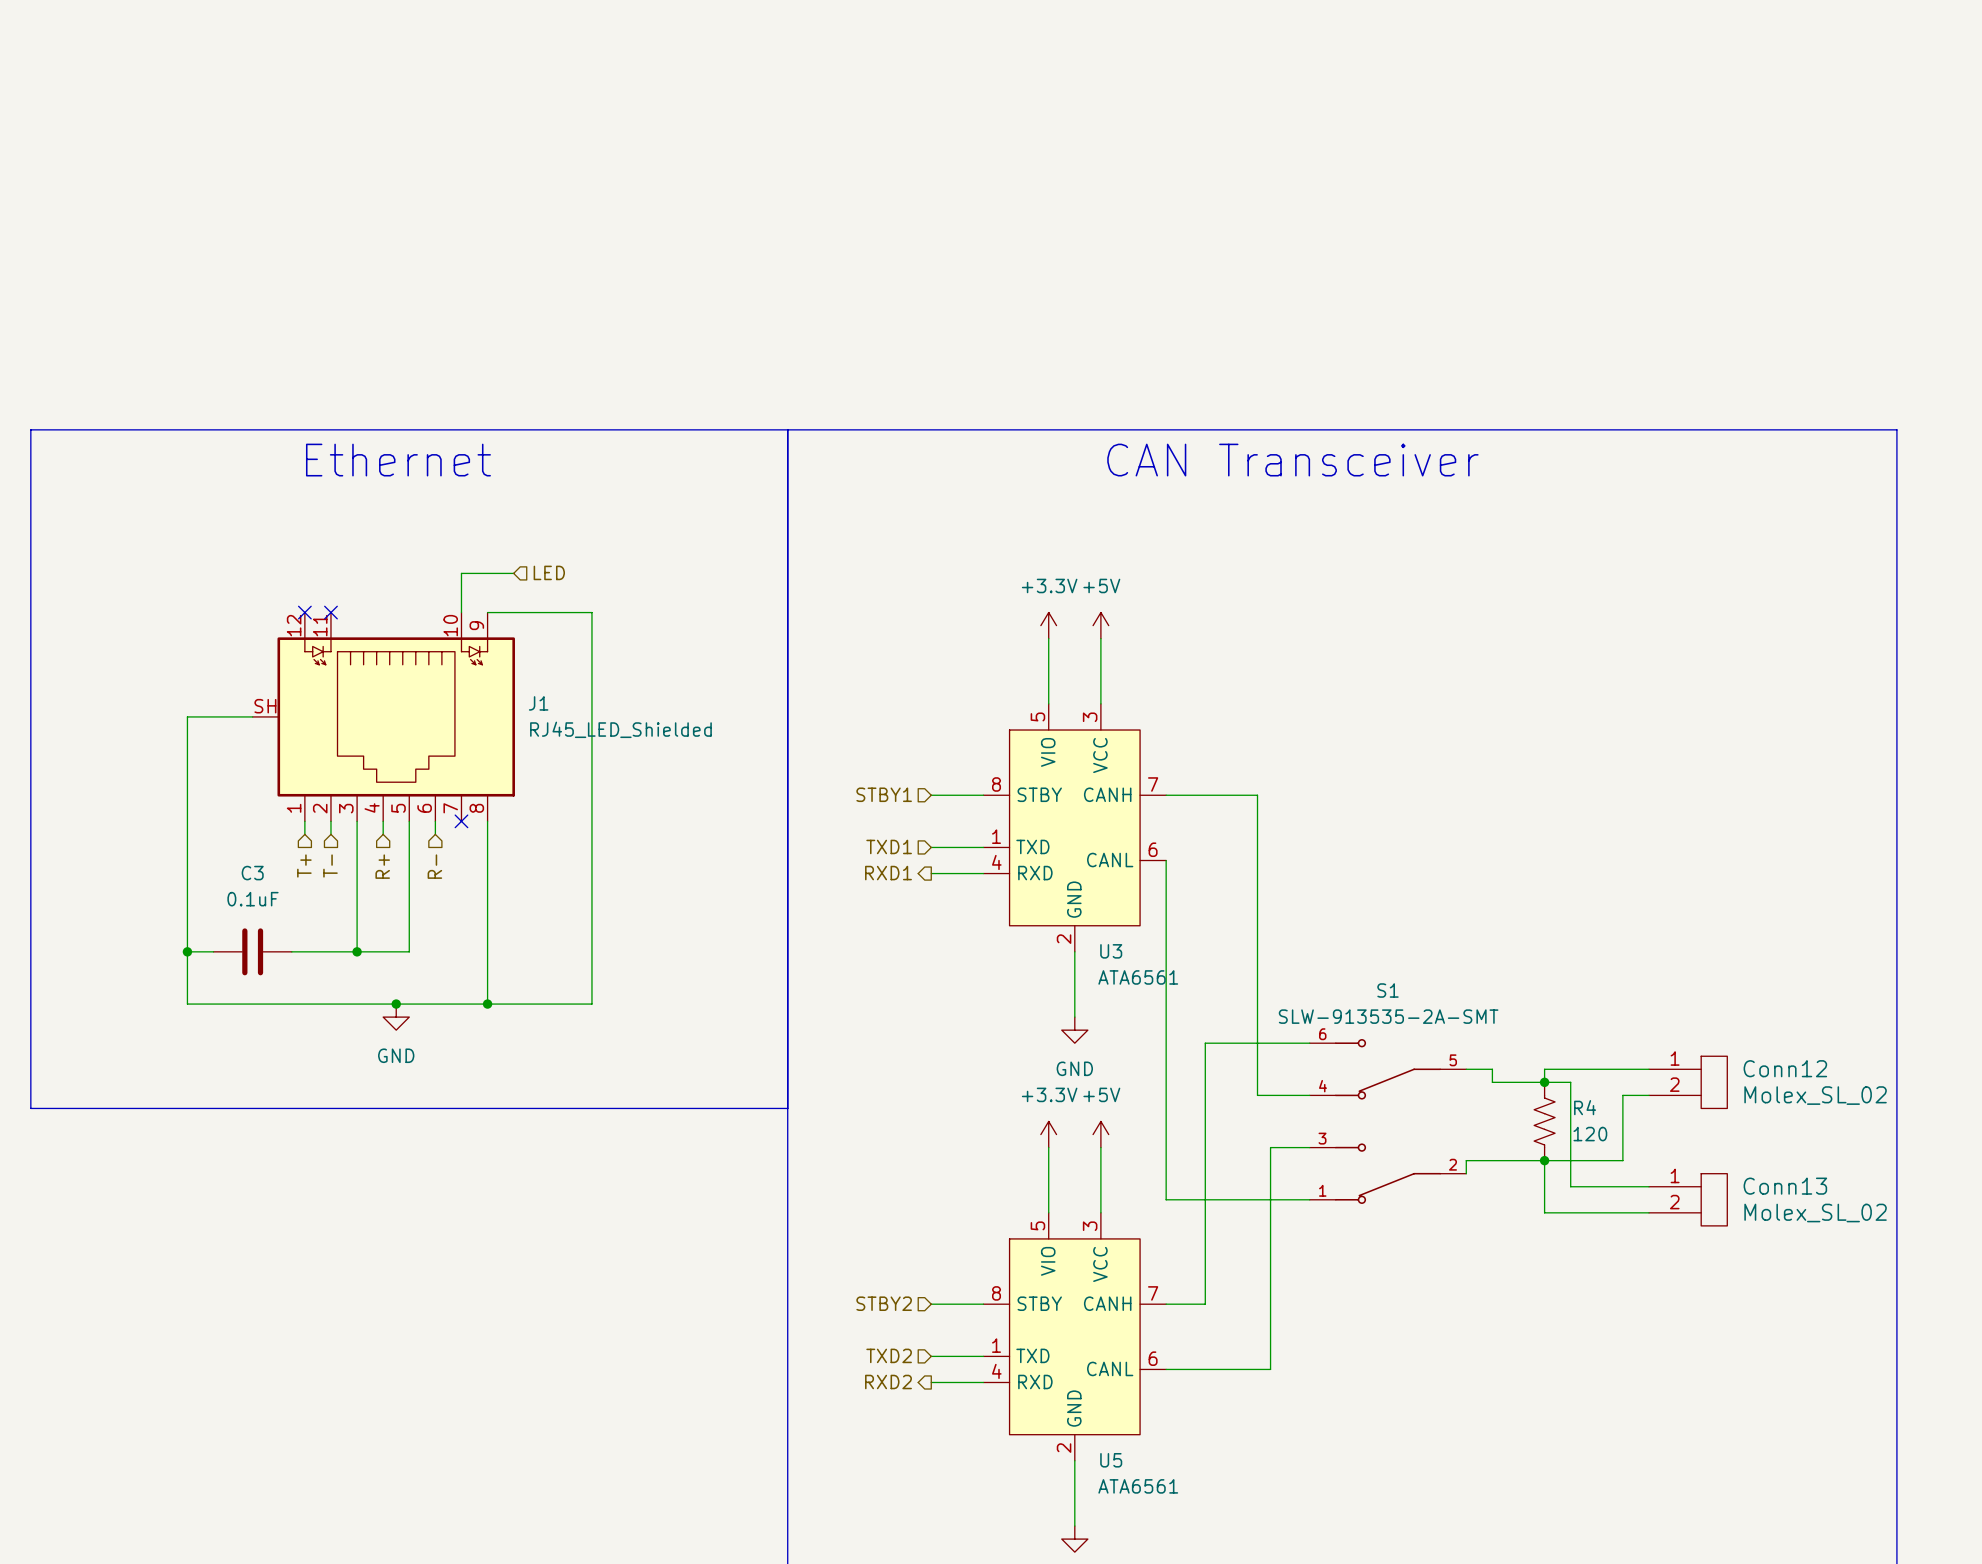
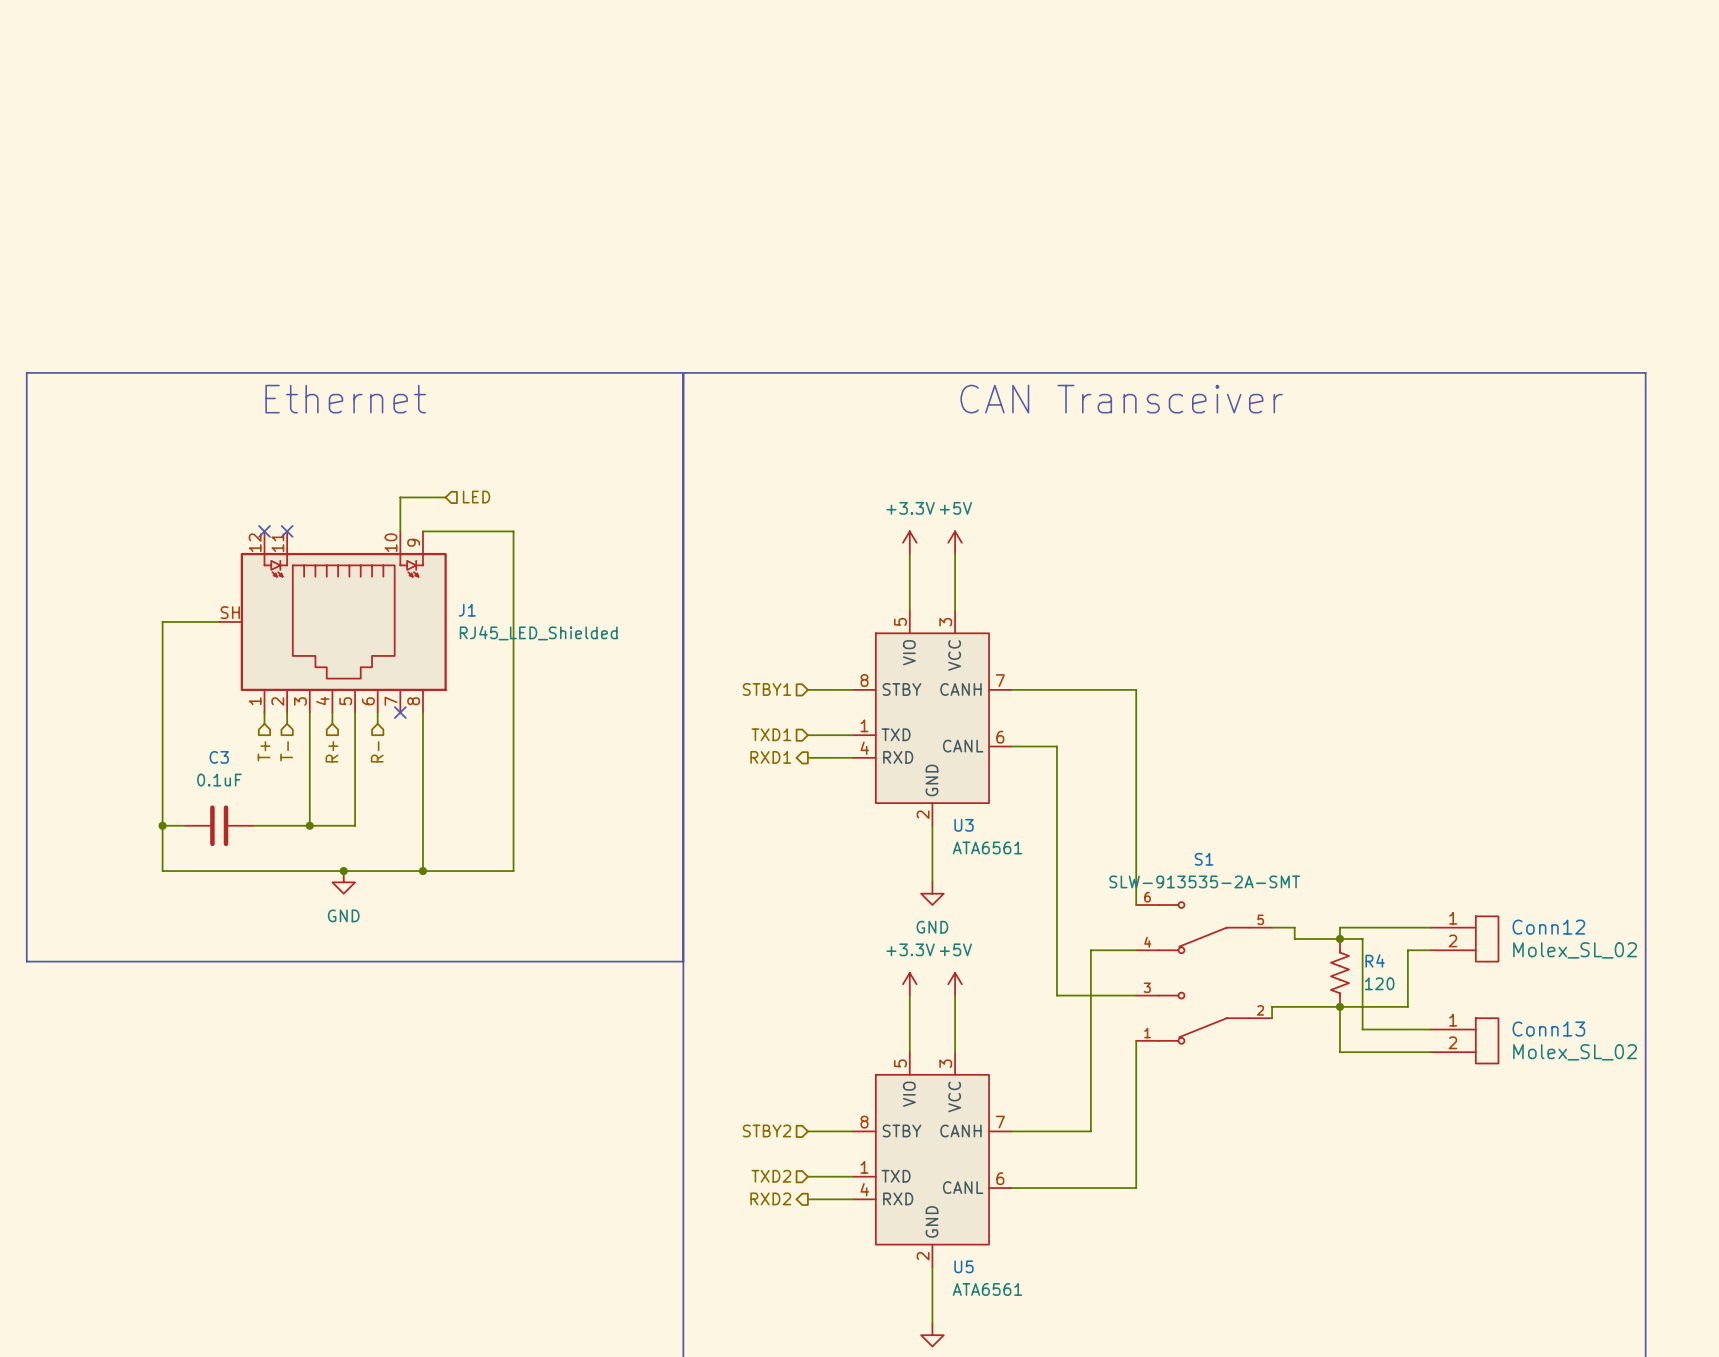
wire: (1257, 795) (1257, 1095) -> (1090, 689) (1136, 689) (1136, 905)
wire: (1166, 860) (1166, 1199) (1309, 1199) -> (1011, 746) (1056, 746) (1056, 995) (1102, 995)
wire: (1309, 1043) (1205, 1043) (1205, 1304) -> (1090, 950) (1090, 1131) (1045, 1131)
wire: (1270, 1147) (1270, 1369) -> (1136, 1040) (1136, 1188) (1102, 1188)

